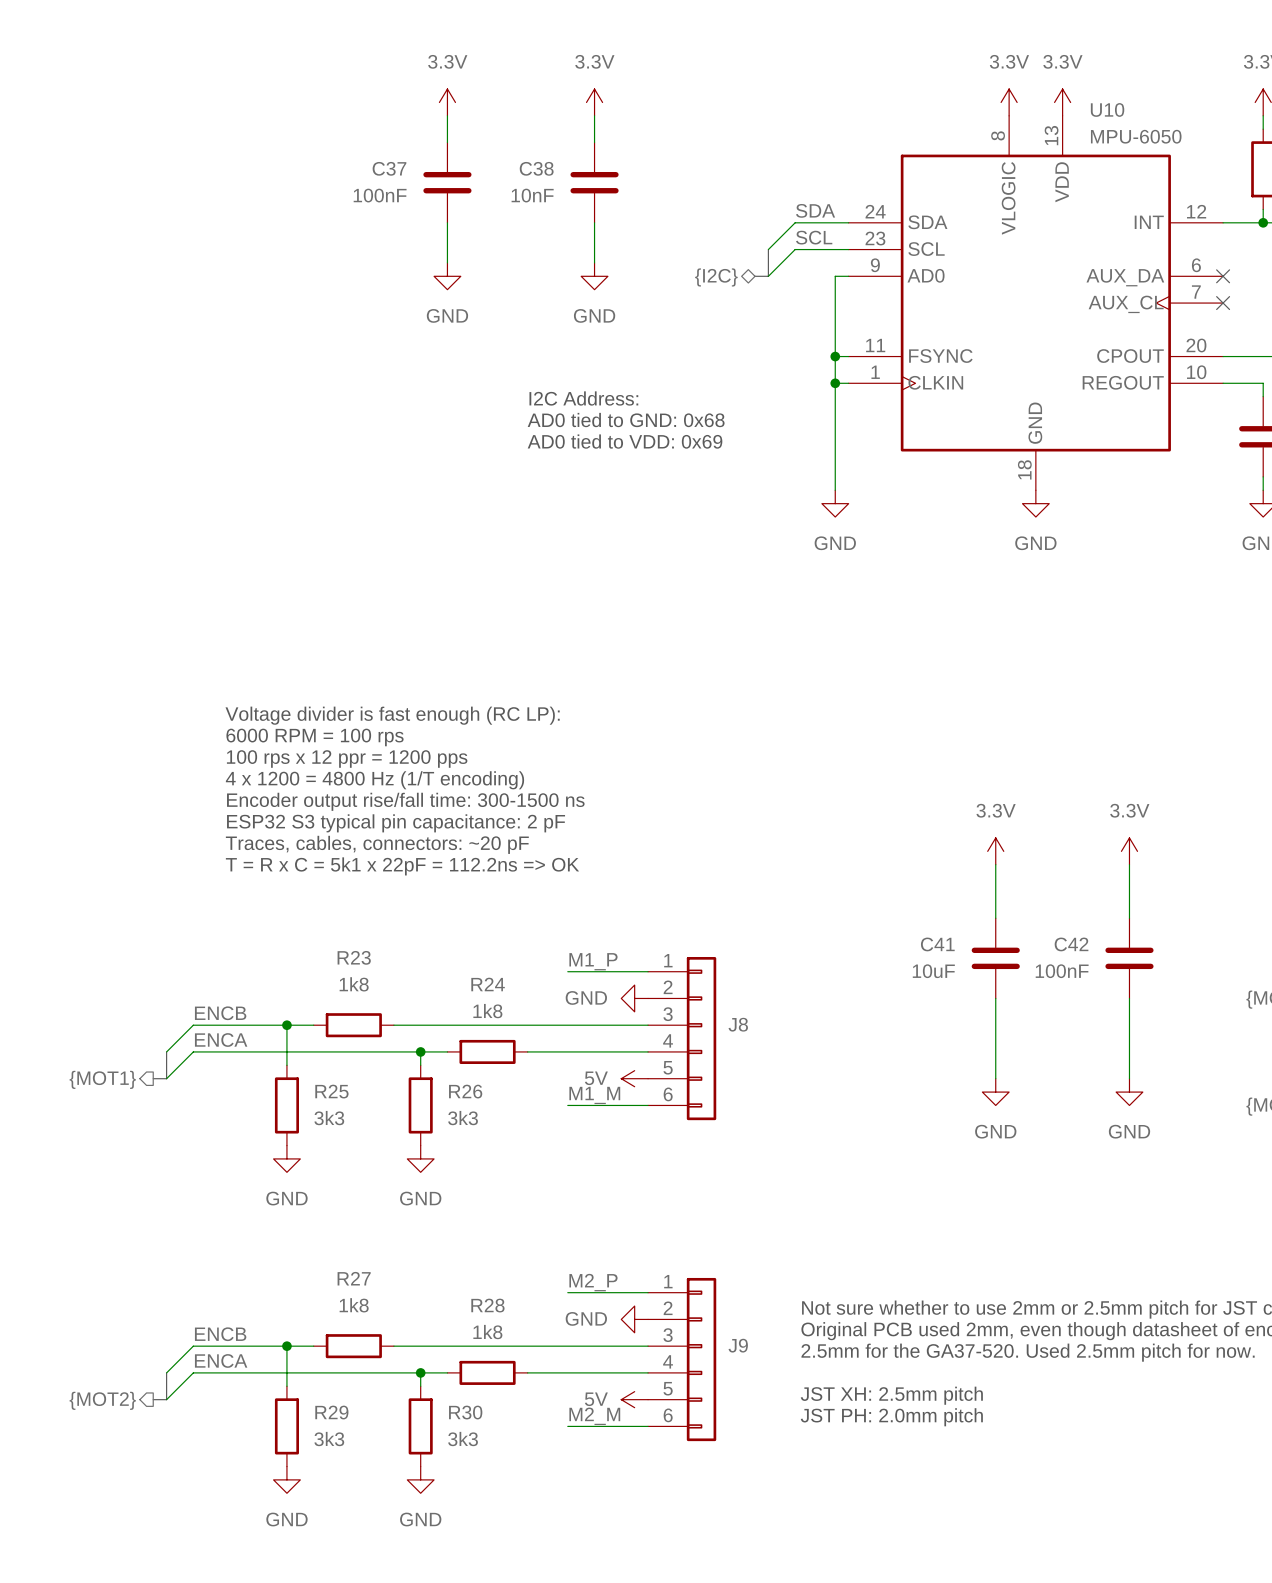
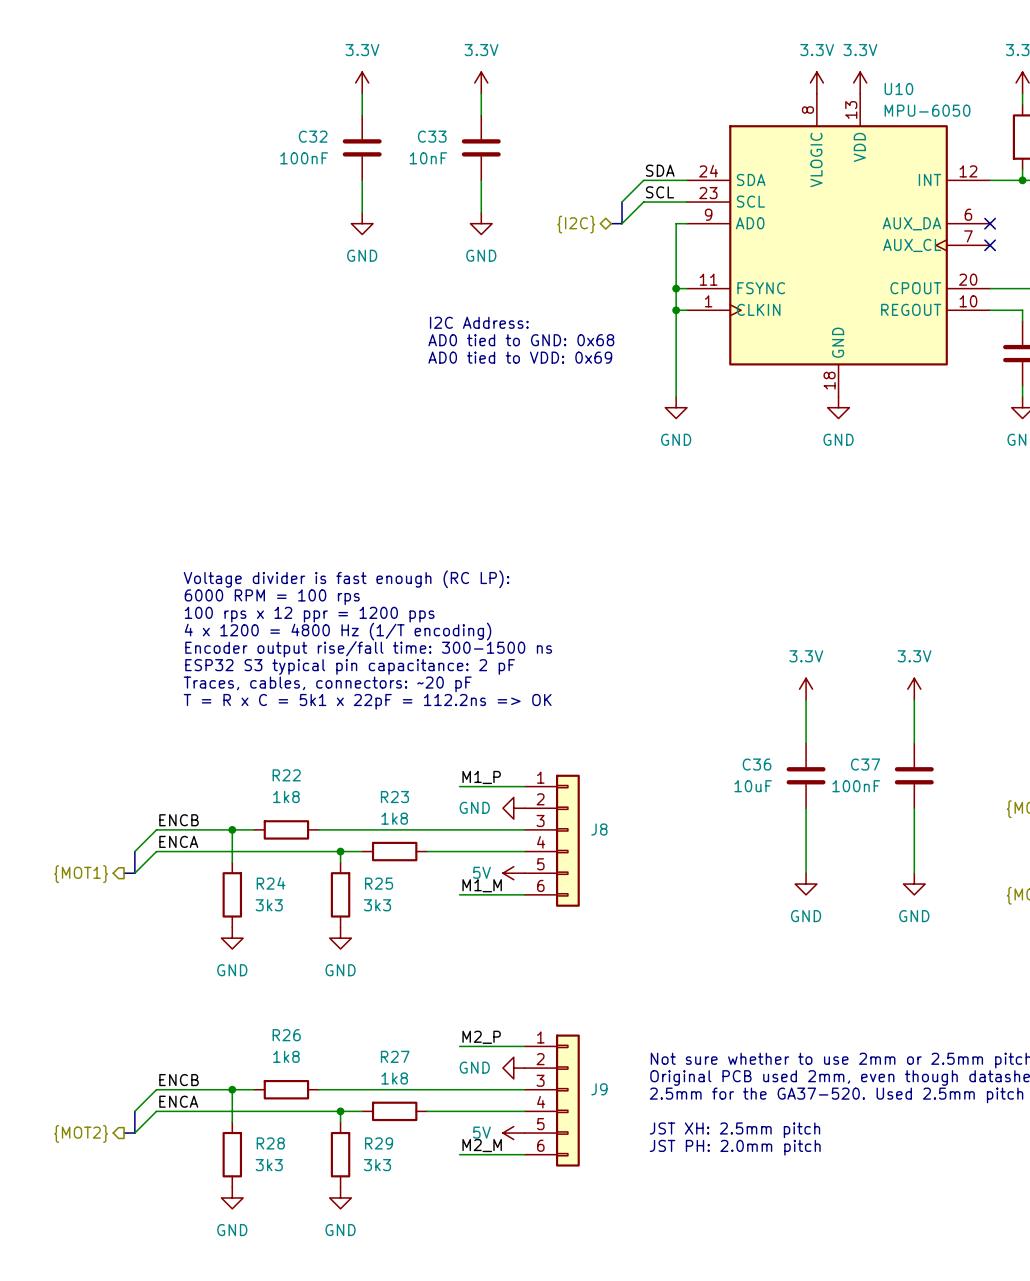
C37 name: C37 (389, 168) -> C32 (313, 136)
C38 name: C38 (536, 168) -> C33 (432, 136)
C41 name: C41 (937, 944) -> C36 (757, 764)
C42 name: C42 (1071, 944) -> C37 (865, 764)
R23 name: R23 (354, 957) -> R22 (286, 775)
R24 name: R24 (488, 984) -> R23 (394, 797)
R25 name: R25 (331, 1091) -> R24 (271, 883)
R26 name: R26 (465, 1091) -> R25 (379, 883)
R27 name: R27 (354, 1278) -> R26 (286, 1035)
R28 name: R28 (487, 1305) -> R27 (395, 1056)
R29 name: R29 (331, 1412) -> R28 (270, 1143)
R30 name: R30 (465, 1412) -> R29 (379, 1143)

